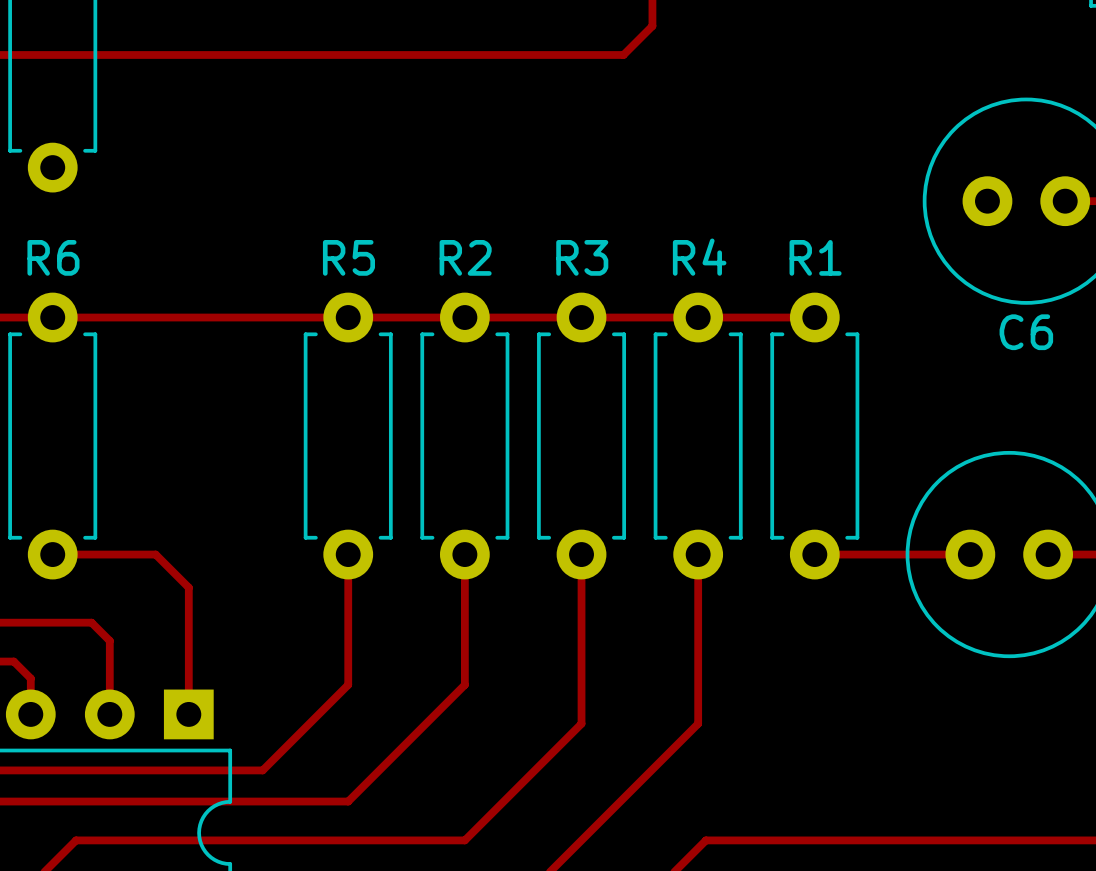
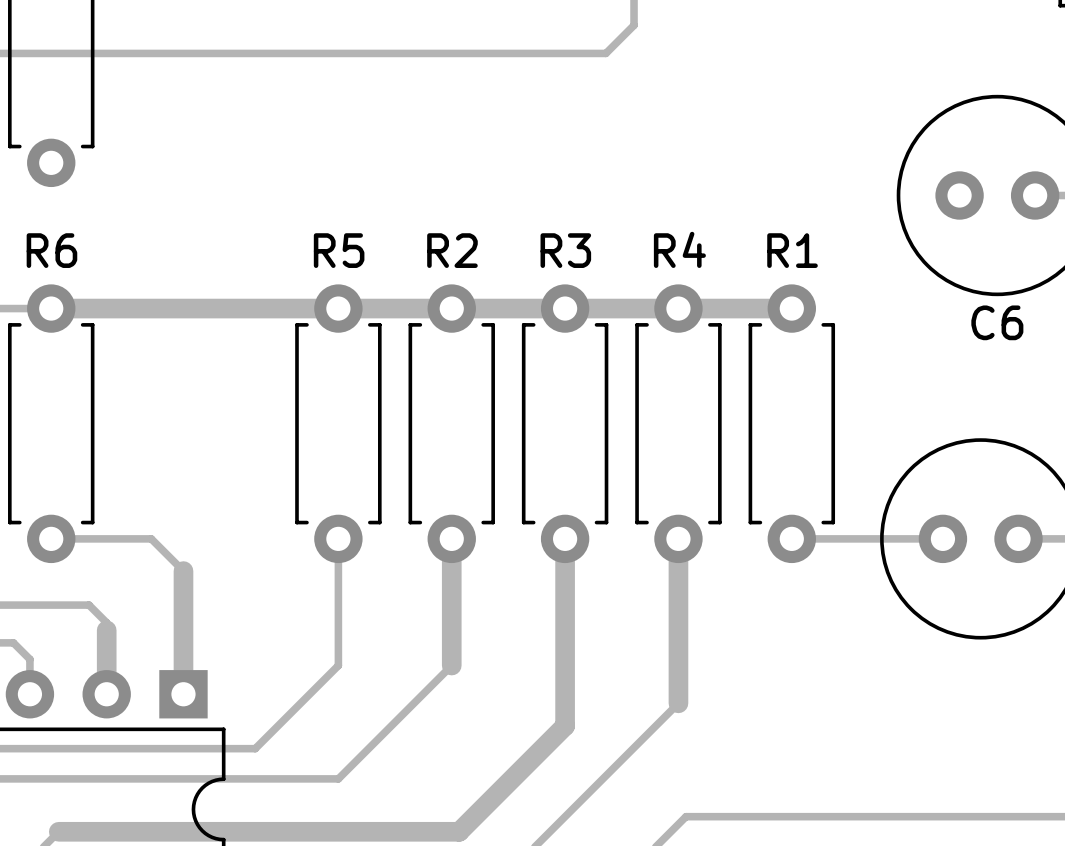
track width: thin (68, 317) (814, 317) -> thick (66, 308) (791, 308)
track width: thin (464, 548) (464, 684) -> thick (451, 533) (451, 665)
track width: thin (581, 548) (581, 723) -> thick (565, 533) (565, 703)
track width: thin (698, 548) (698, 723) -> thick (678, 533) (678, 703)
track width: thin (188, 587) (188, 714) -> thick (183, 571) (183, 694)
track width: thin (109, 648) (109, 714) -> thick (106, 630) (106, 694)
track: (581, 723) (464, 840) (76, 840) (60, 855) -> (565, 703) (565, 725) (459, 831) (58, 831)

